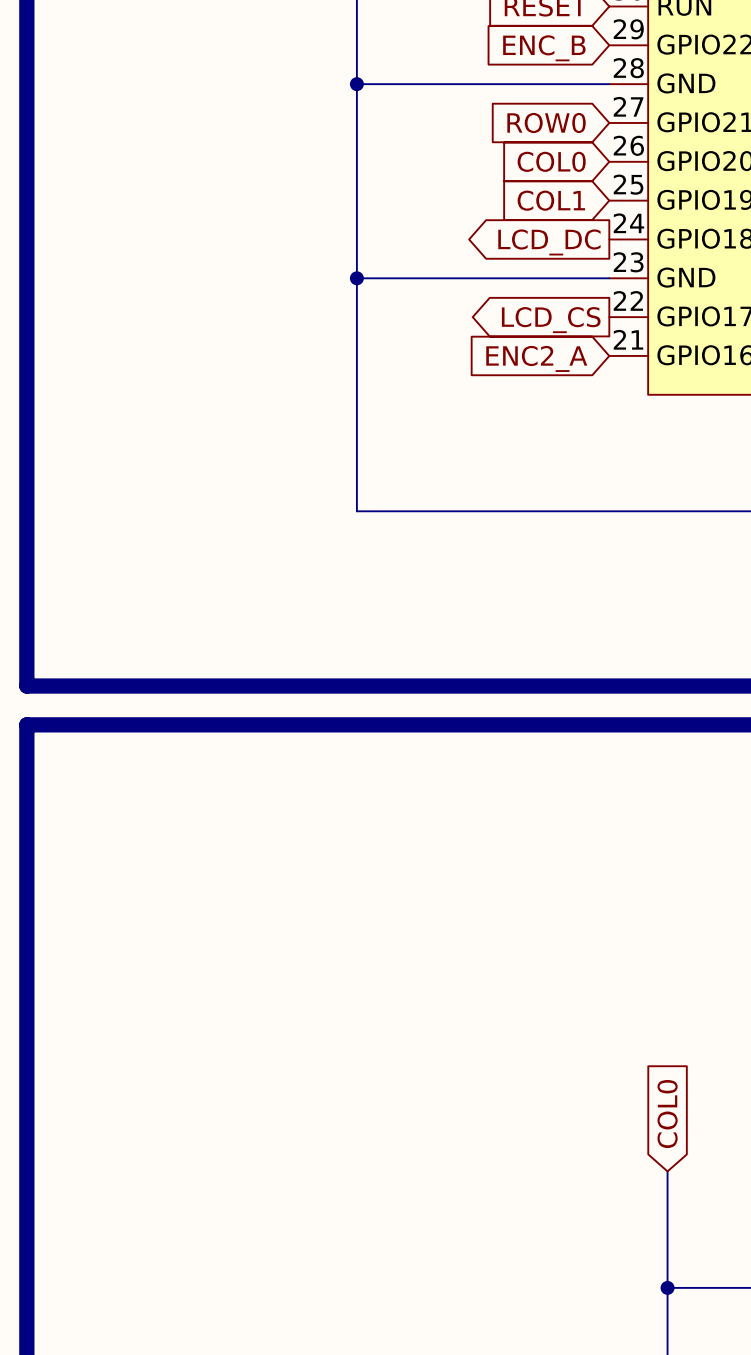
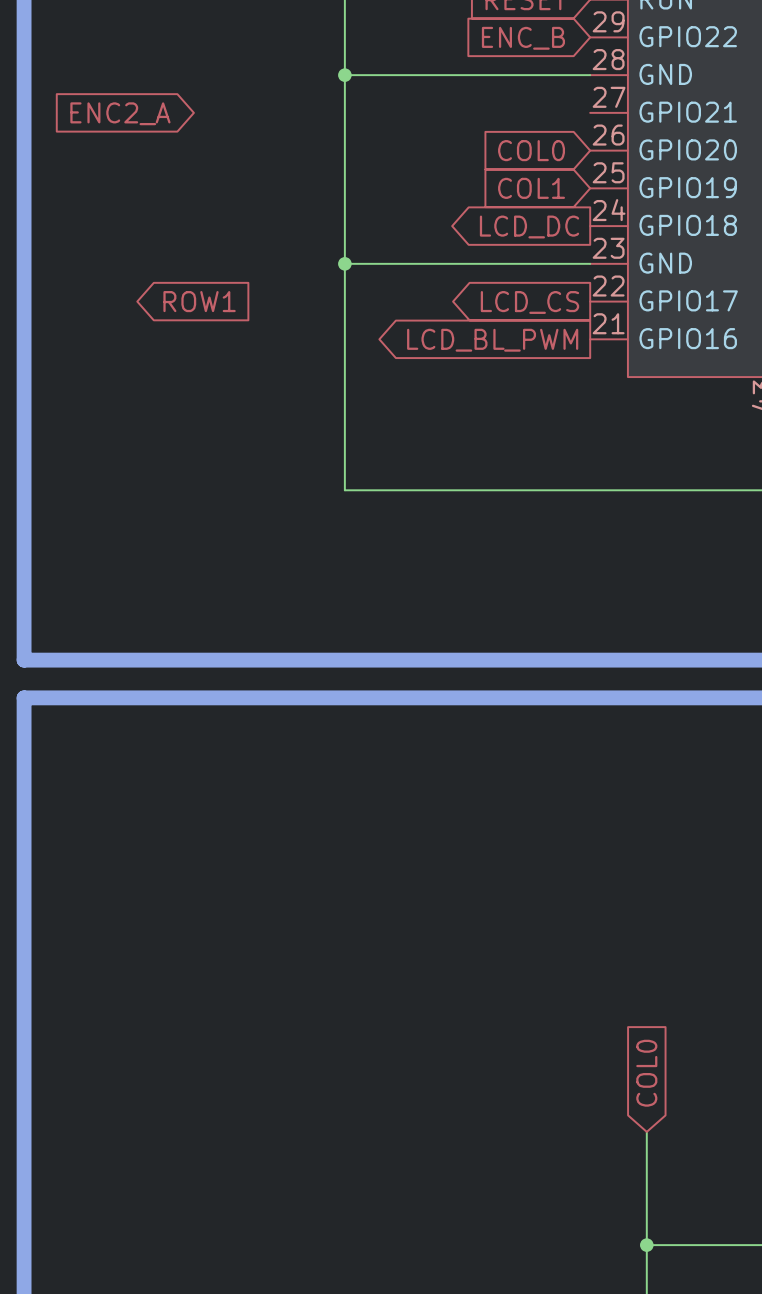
global label: ROW0 (546, 123) -> none
global label: none -> ENC2_A (120, 113)
global label: none -> ROW1 (199, 301)
global label shape: input (536, 358) -> output (492, 340)
global label: ENC2_A (536, 358) -> LCD_BL_PWM (492, 340)

